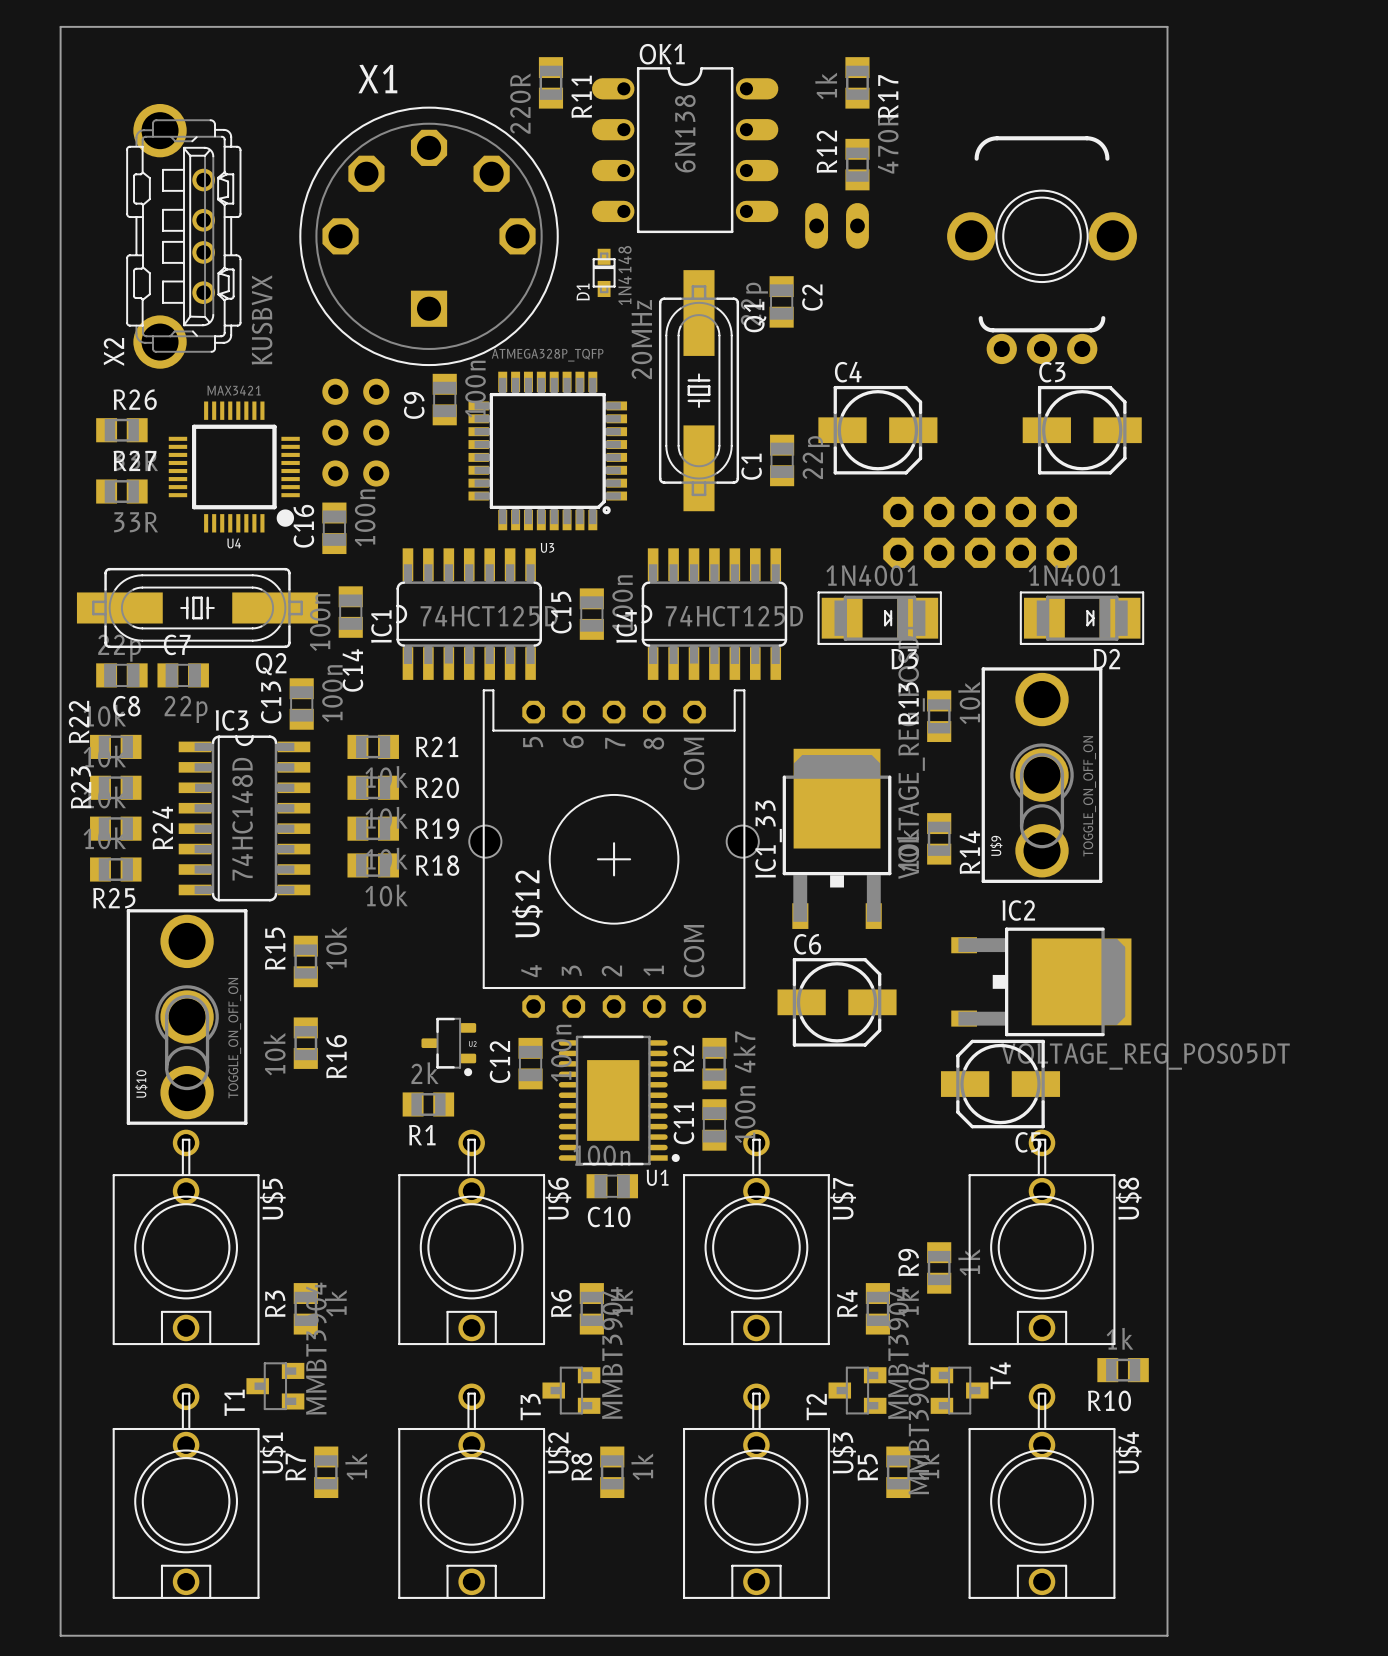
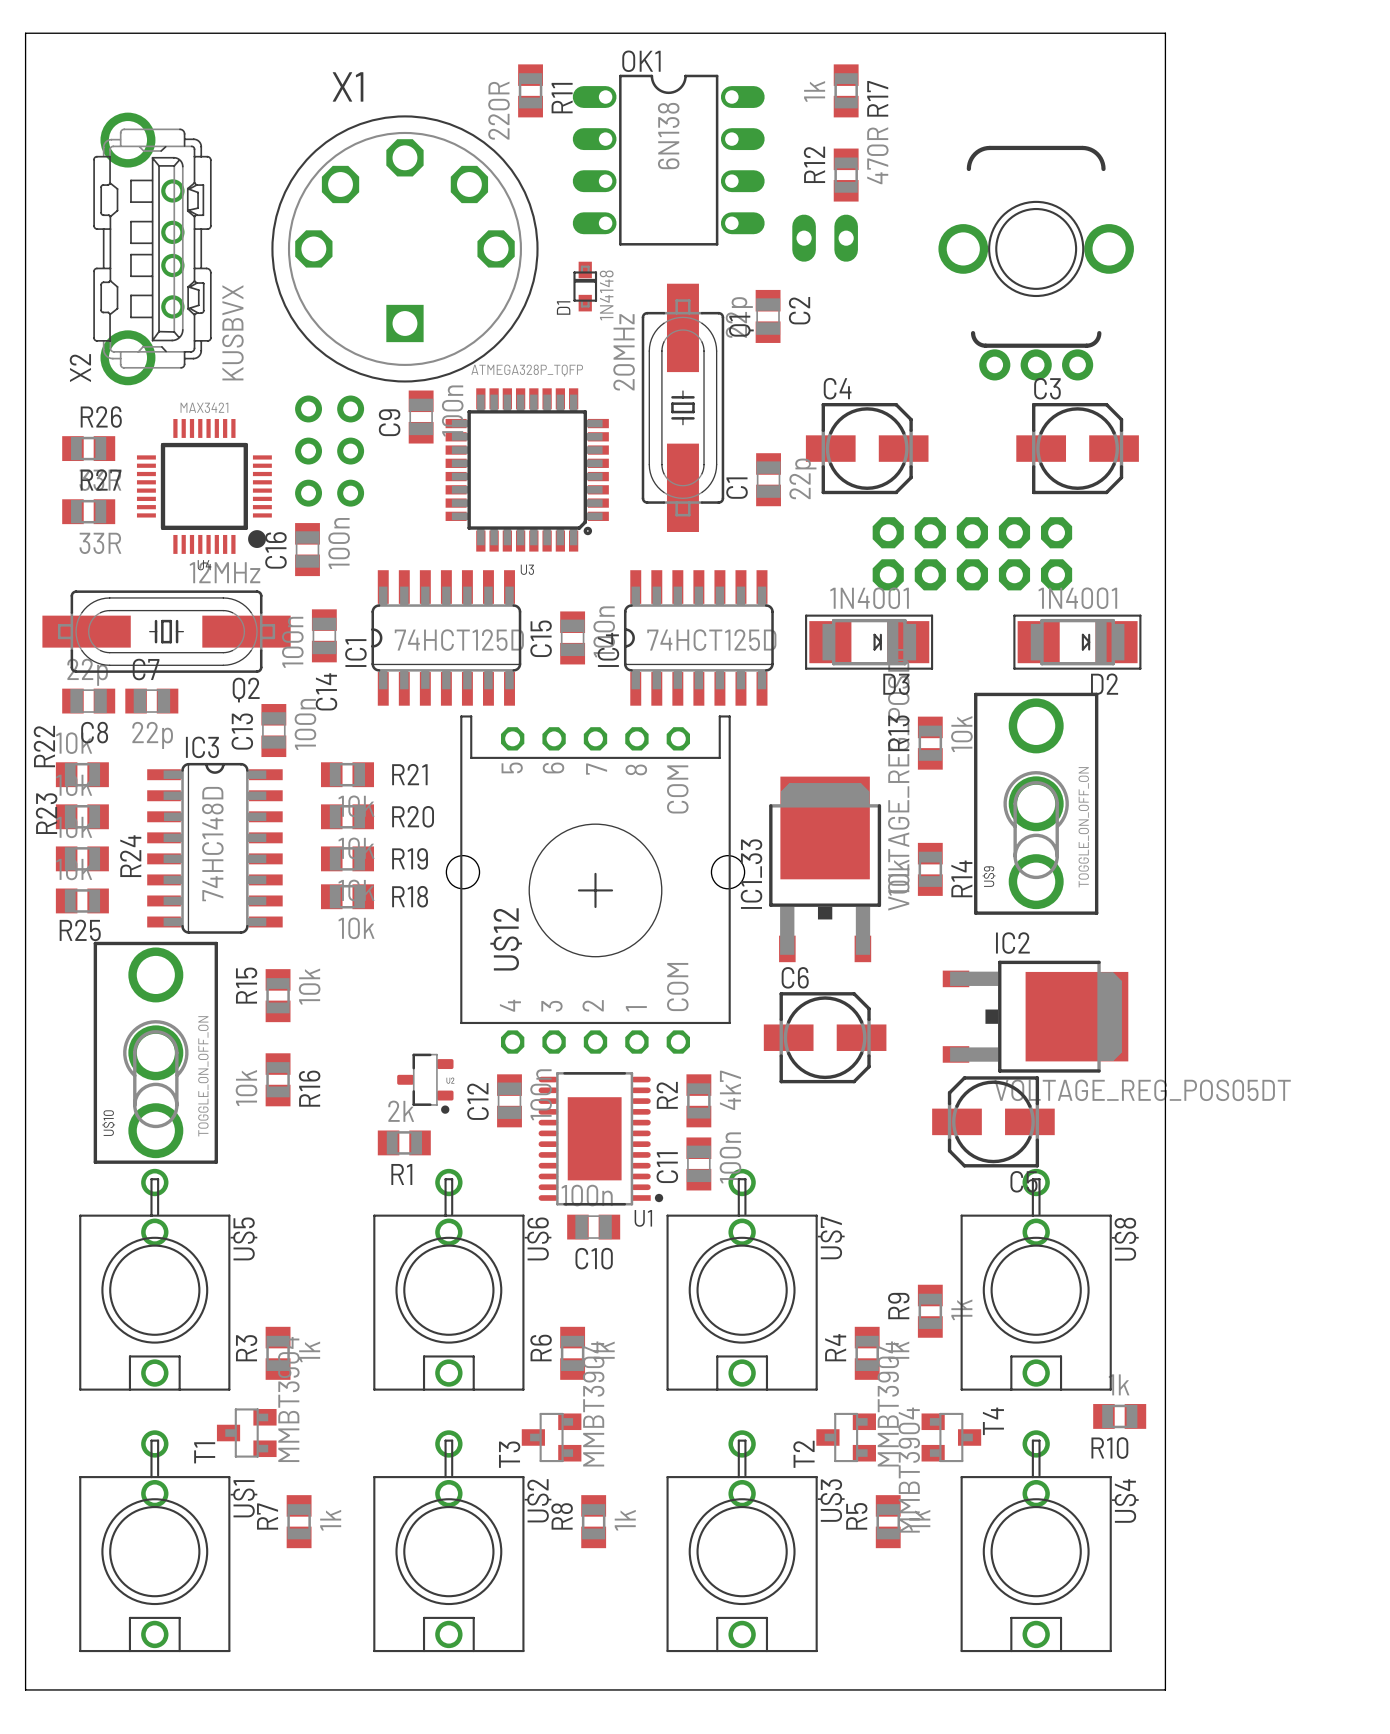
Q2 value: none -> 12MHz (225, 572)

